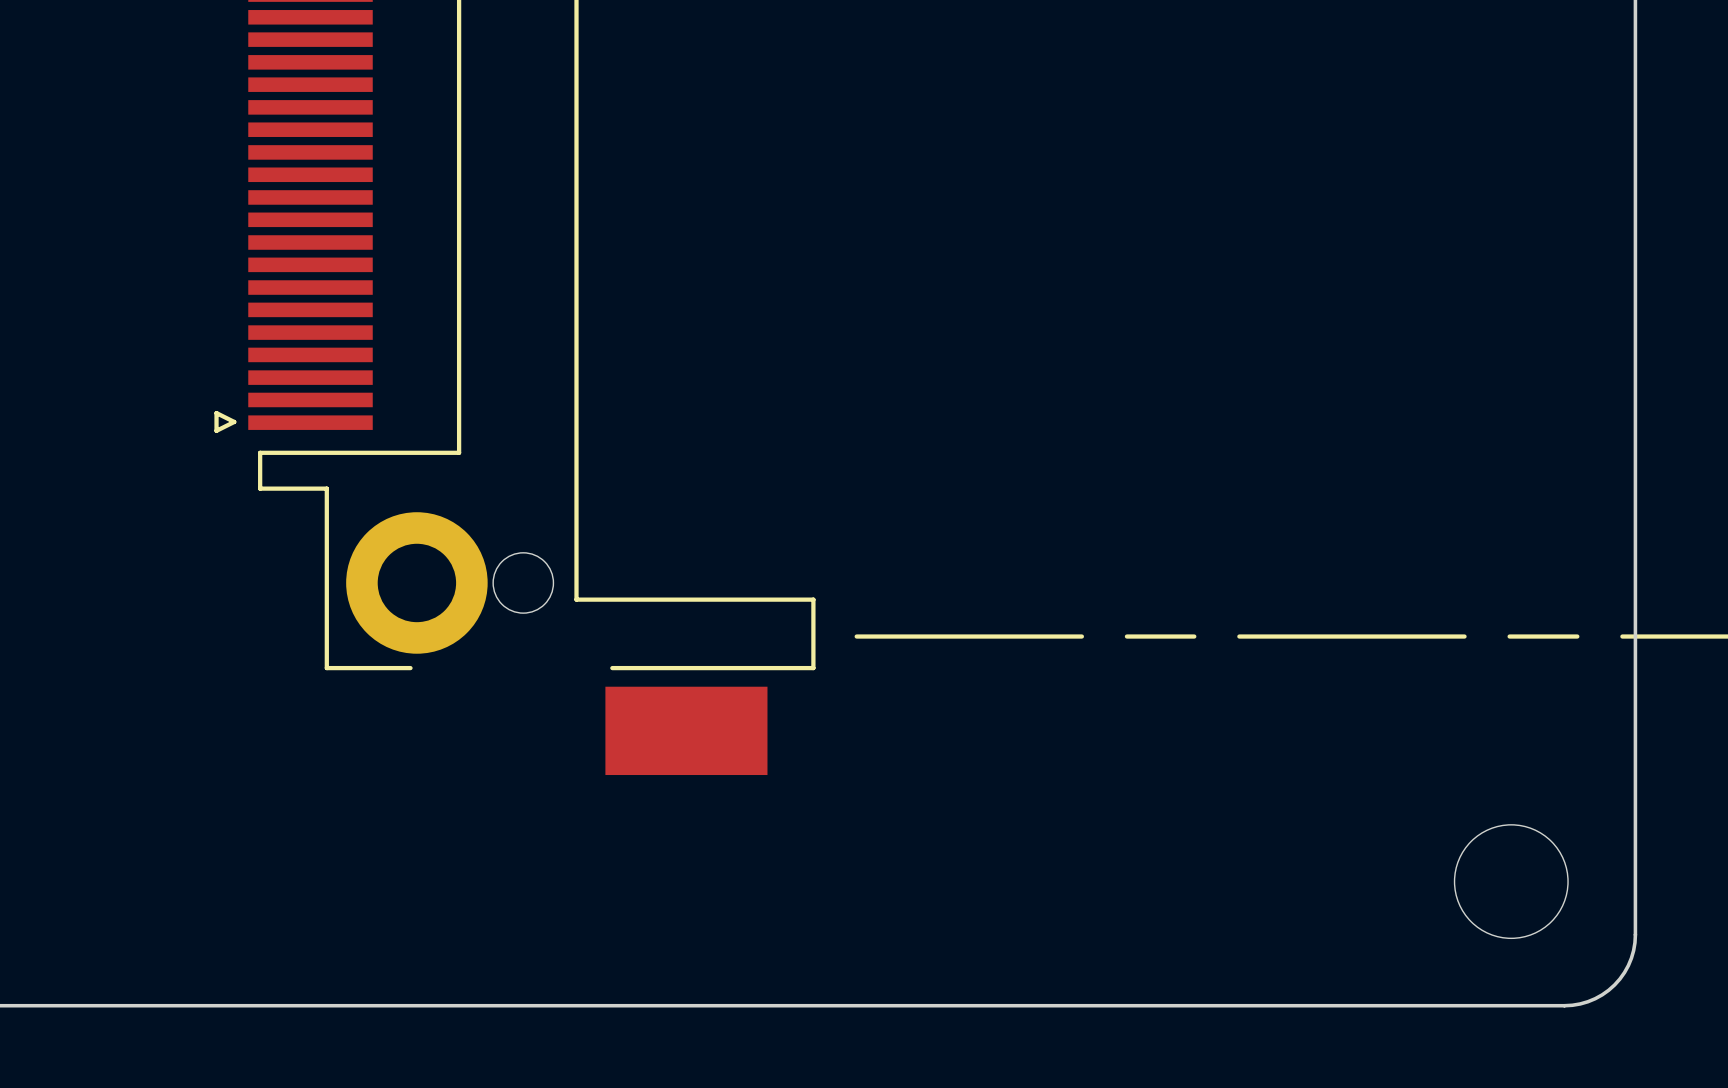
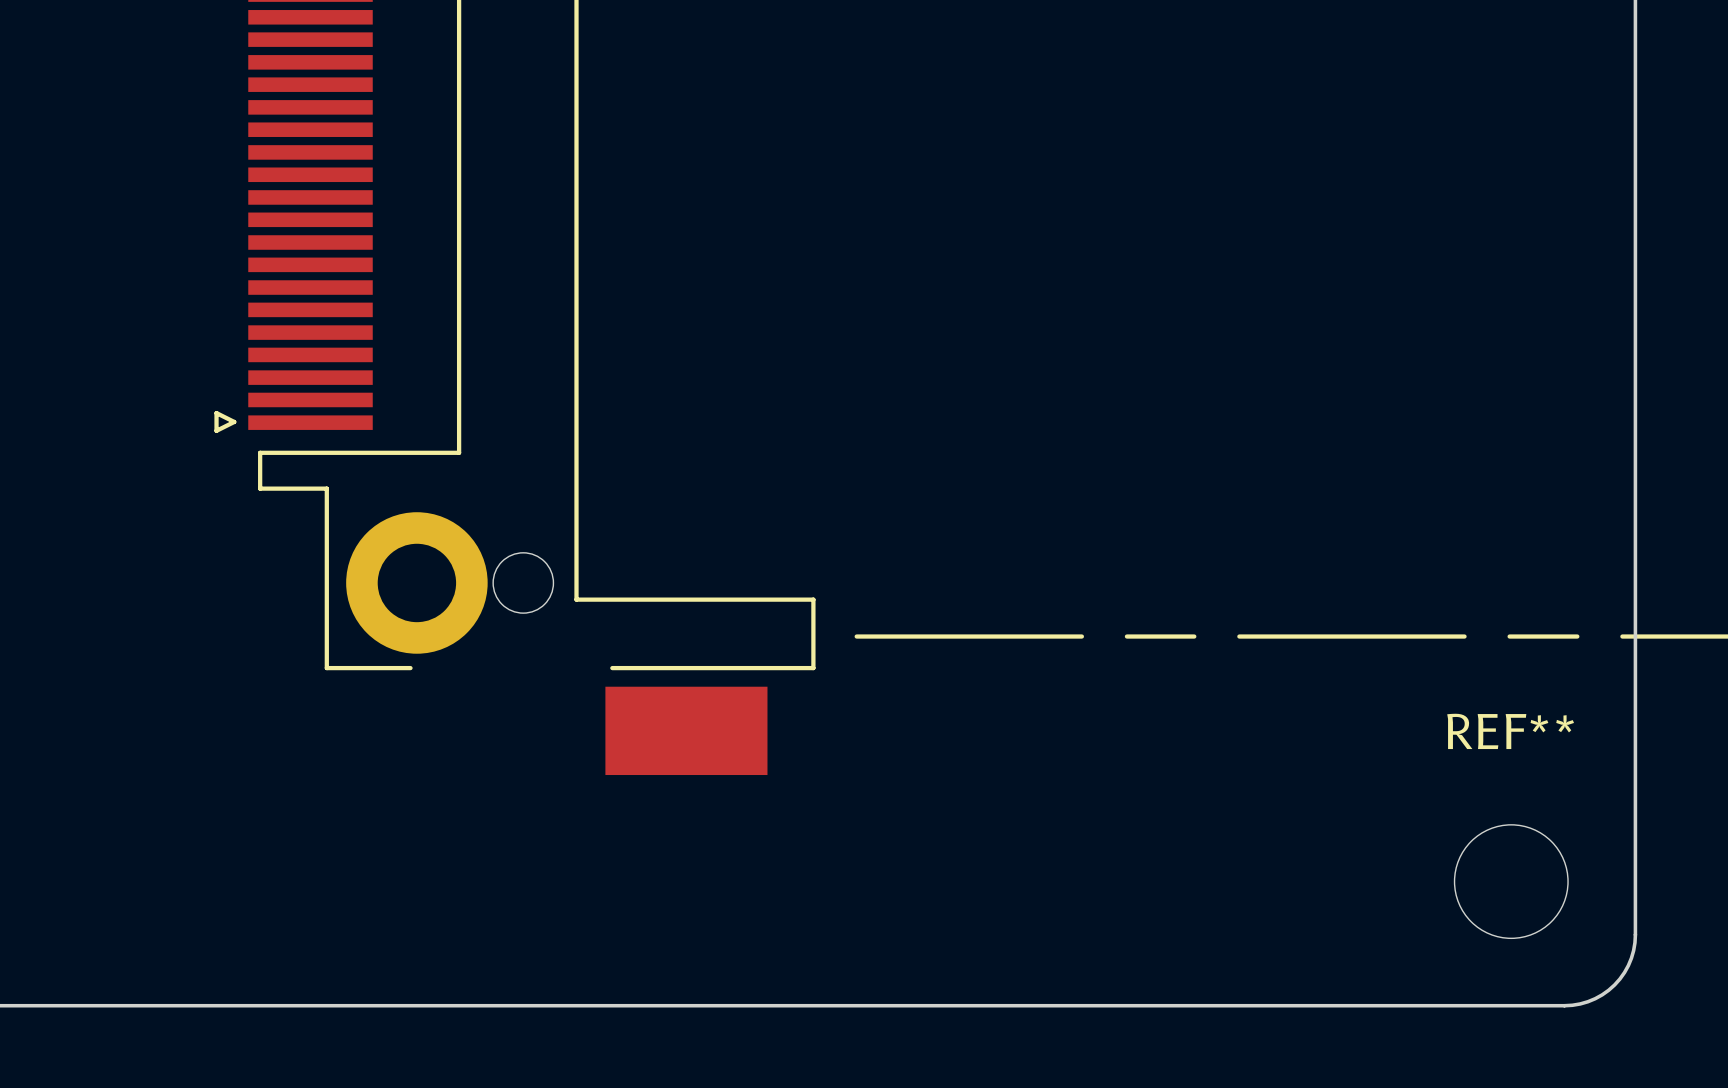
REF** name: none -> REF** (1510, 731)

